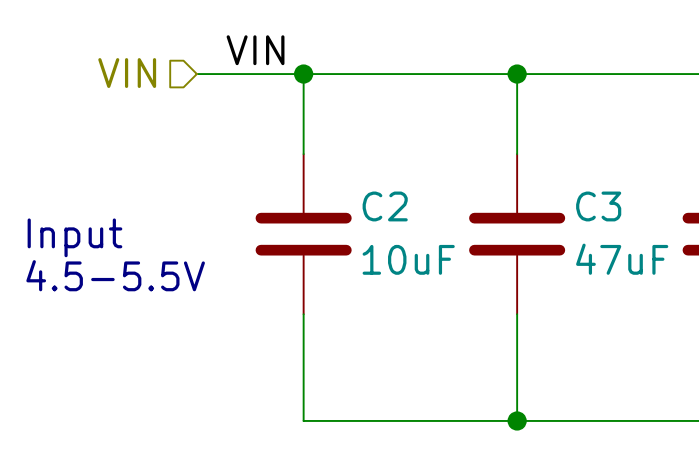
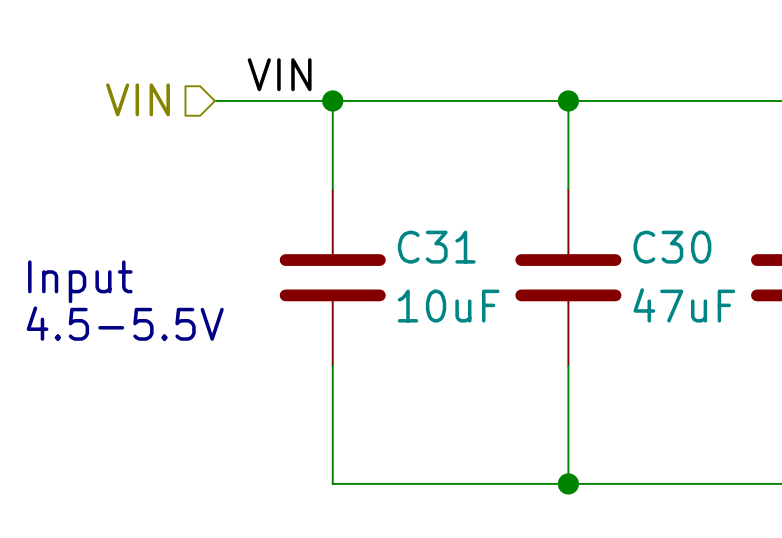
C2 name: C2 (385, 206) -> C31 (436, 247)
C3 name: C3 (598, 206) -> C30 (672, 247)

